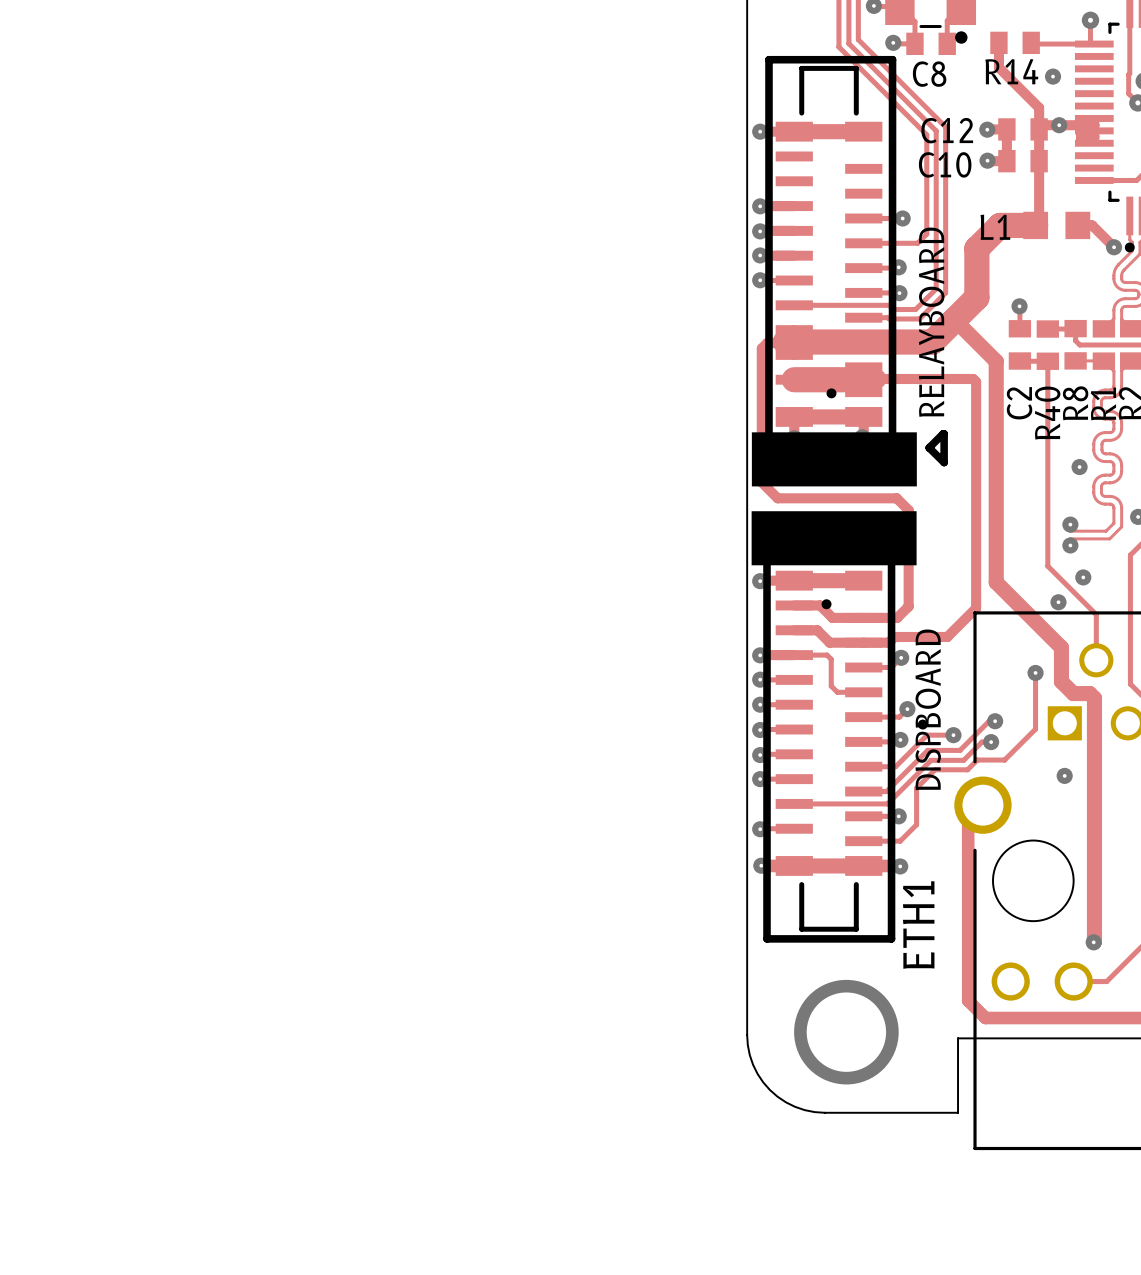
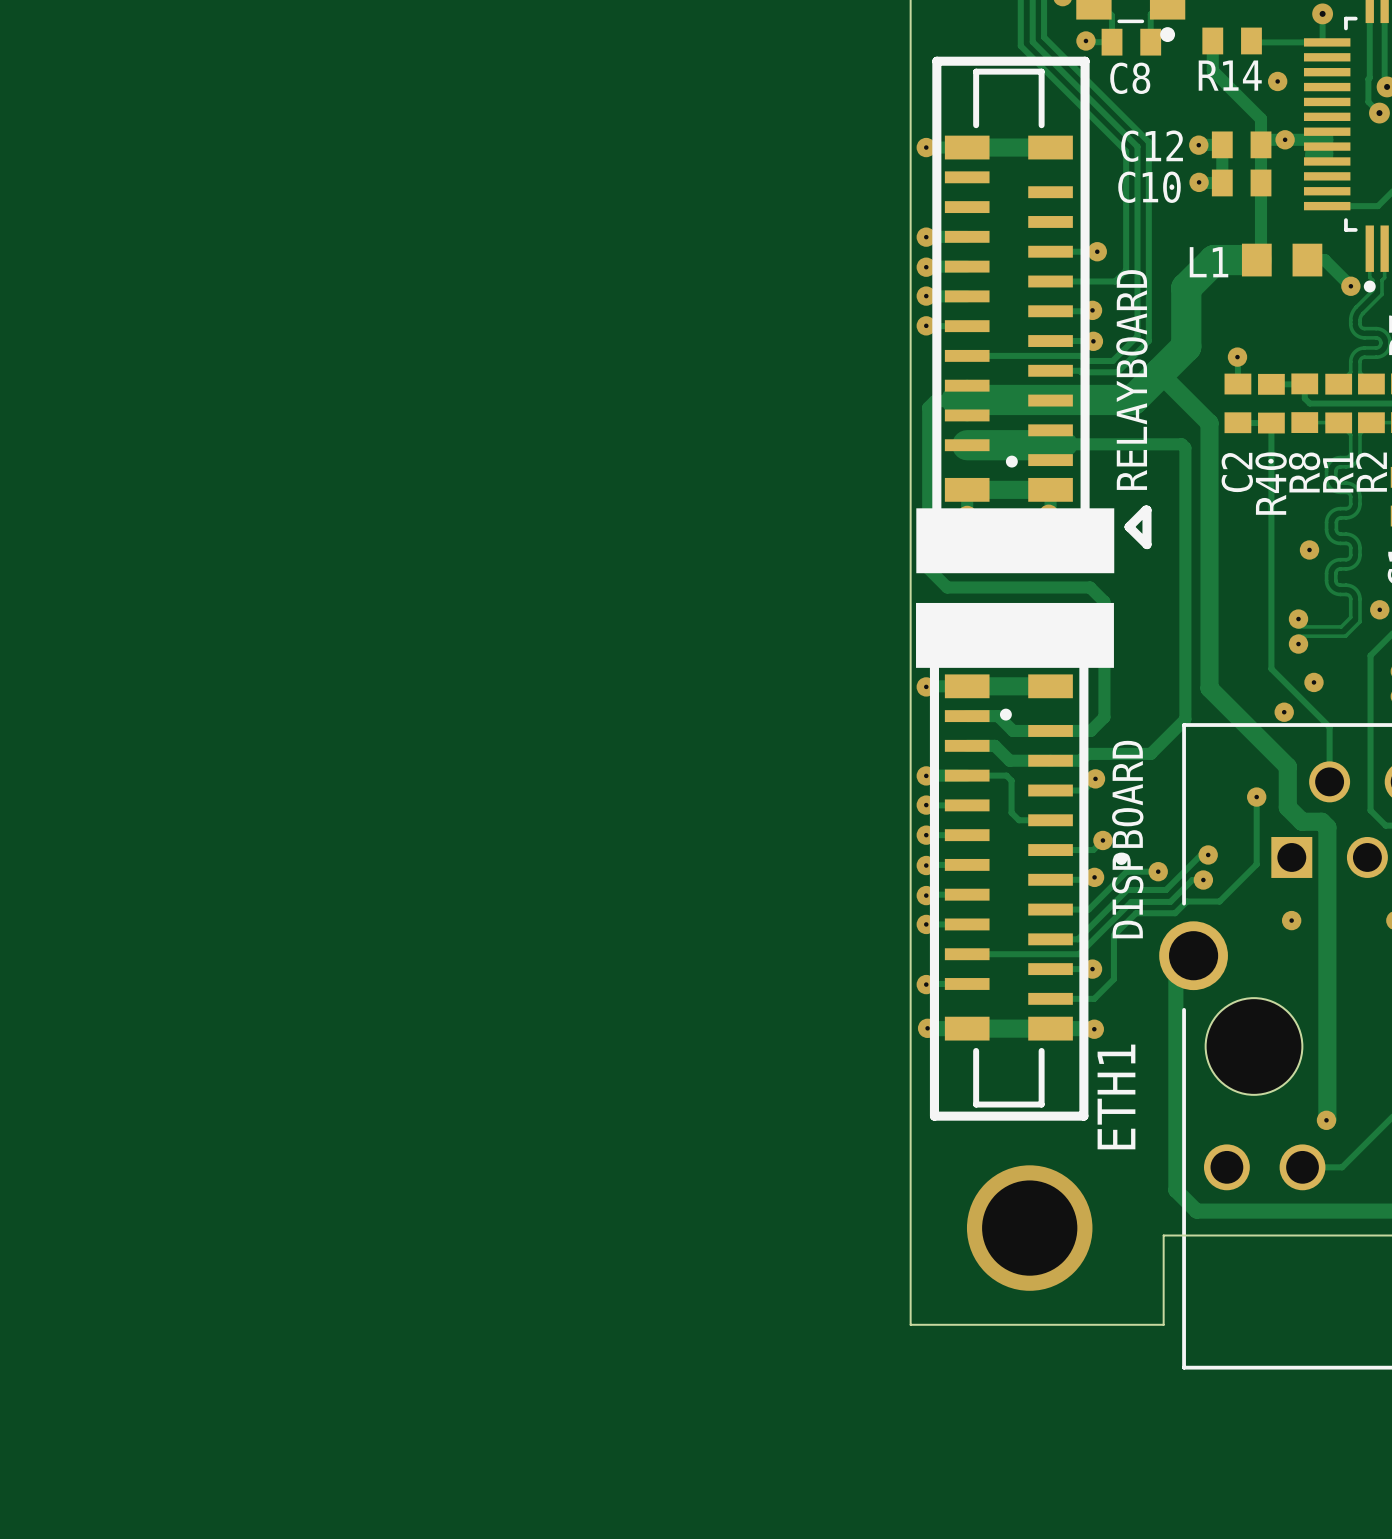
board edge: (747, 1035) (753, 1064) (769, 1090) (795, 1106) (824, 1112) -> (910, 1231) (910, 1324) (1003, 1324)

